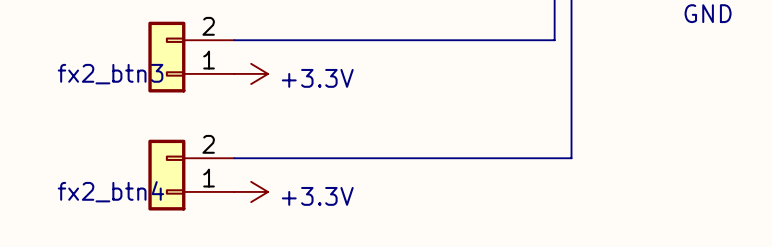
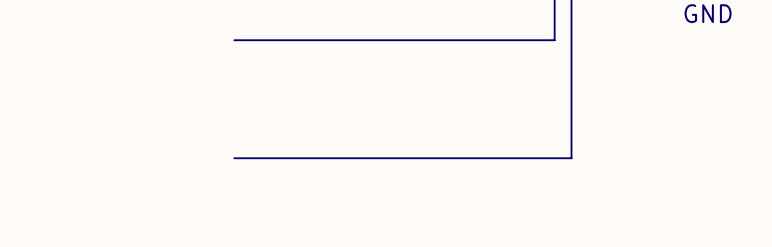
part: (191, 57) -> none
power symbol: +3.3V (251, 73) -> none
part: (191, 175) -> none
power symbol: +3.3V (251, 191) -> none

